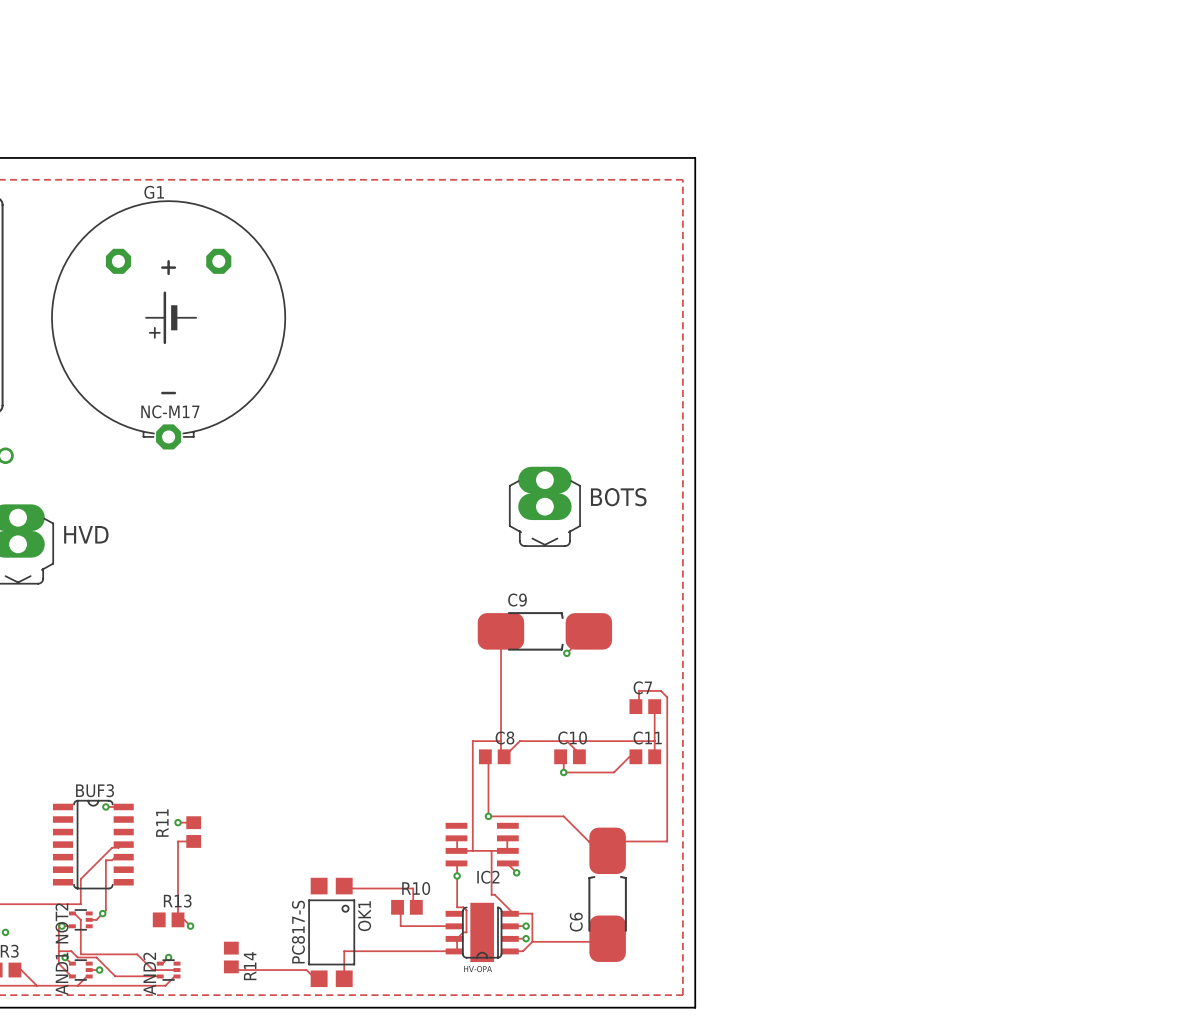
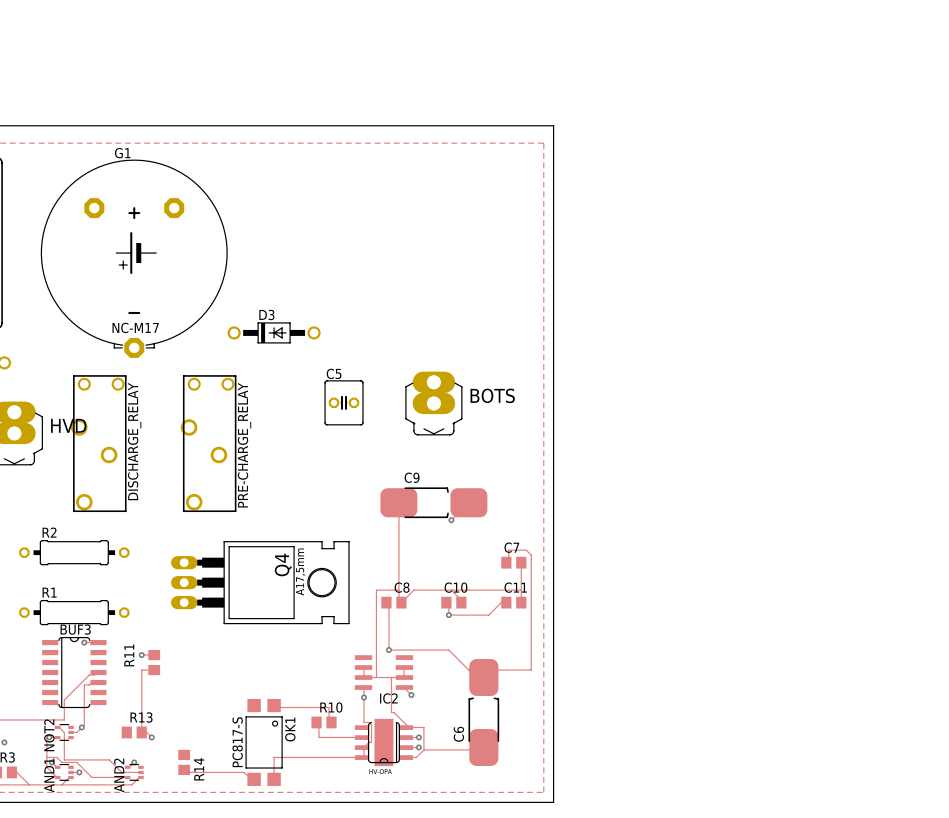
D3: none -> (274, 332)
C5: none -> (344, 402)
DISCHARGE_RELAY: none -> (98, 443)
PRE-CHARGE_RELAY: none -> (208, 443)
R2: none -> (74, 552)
Q4: none -> (260, 582)
R1: none -> (74, 612)

